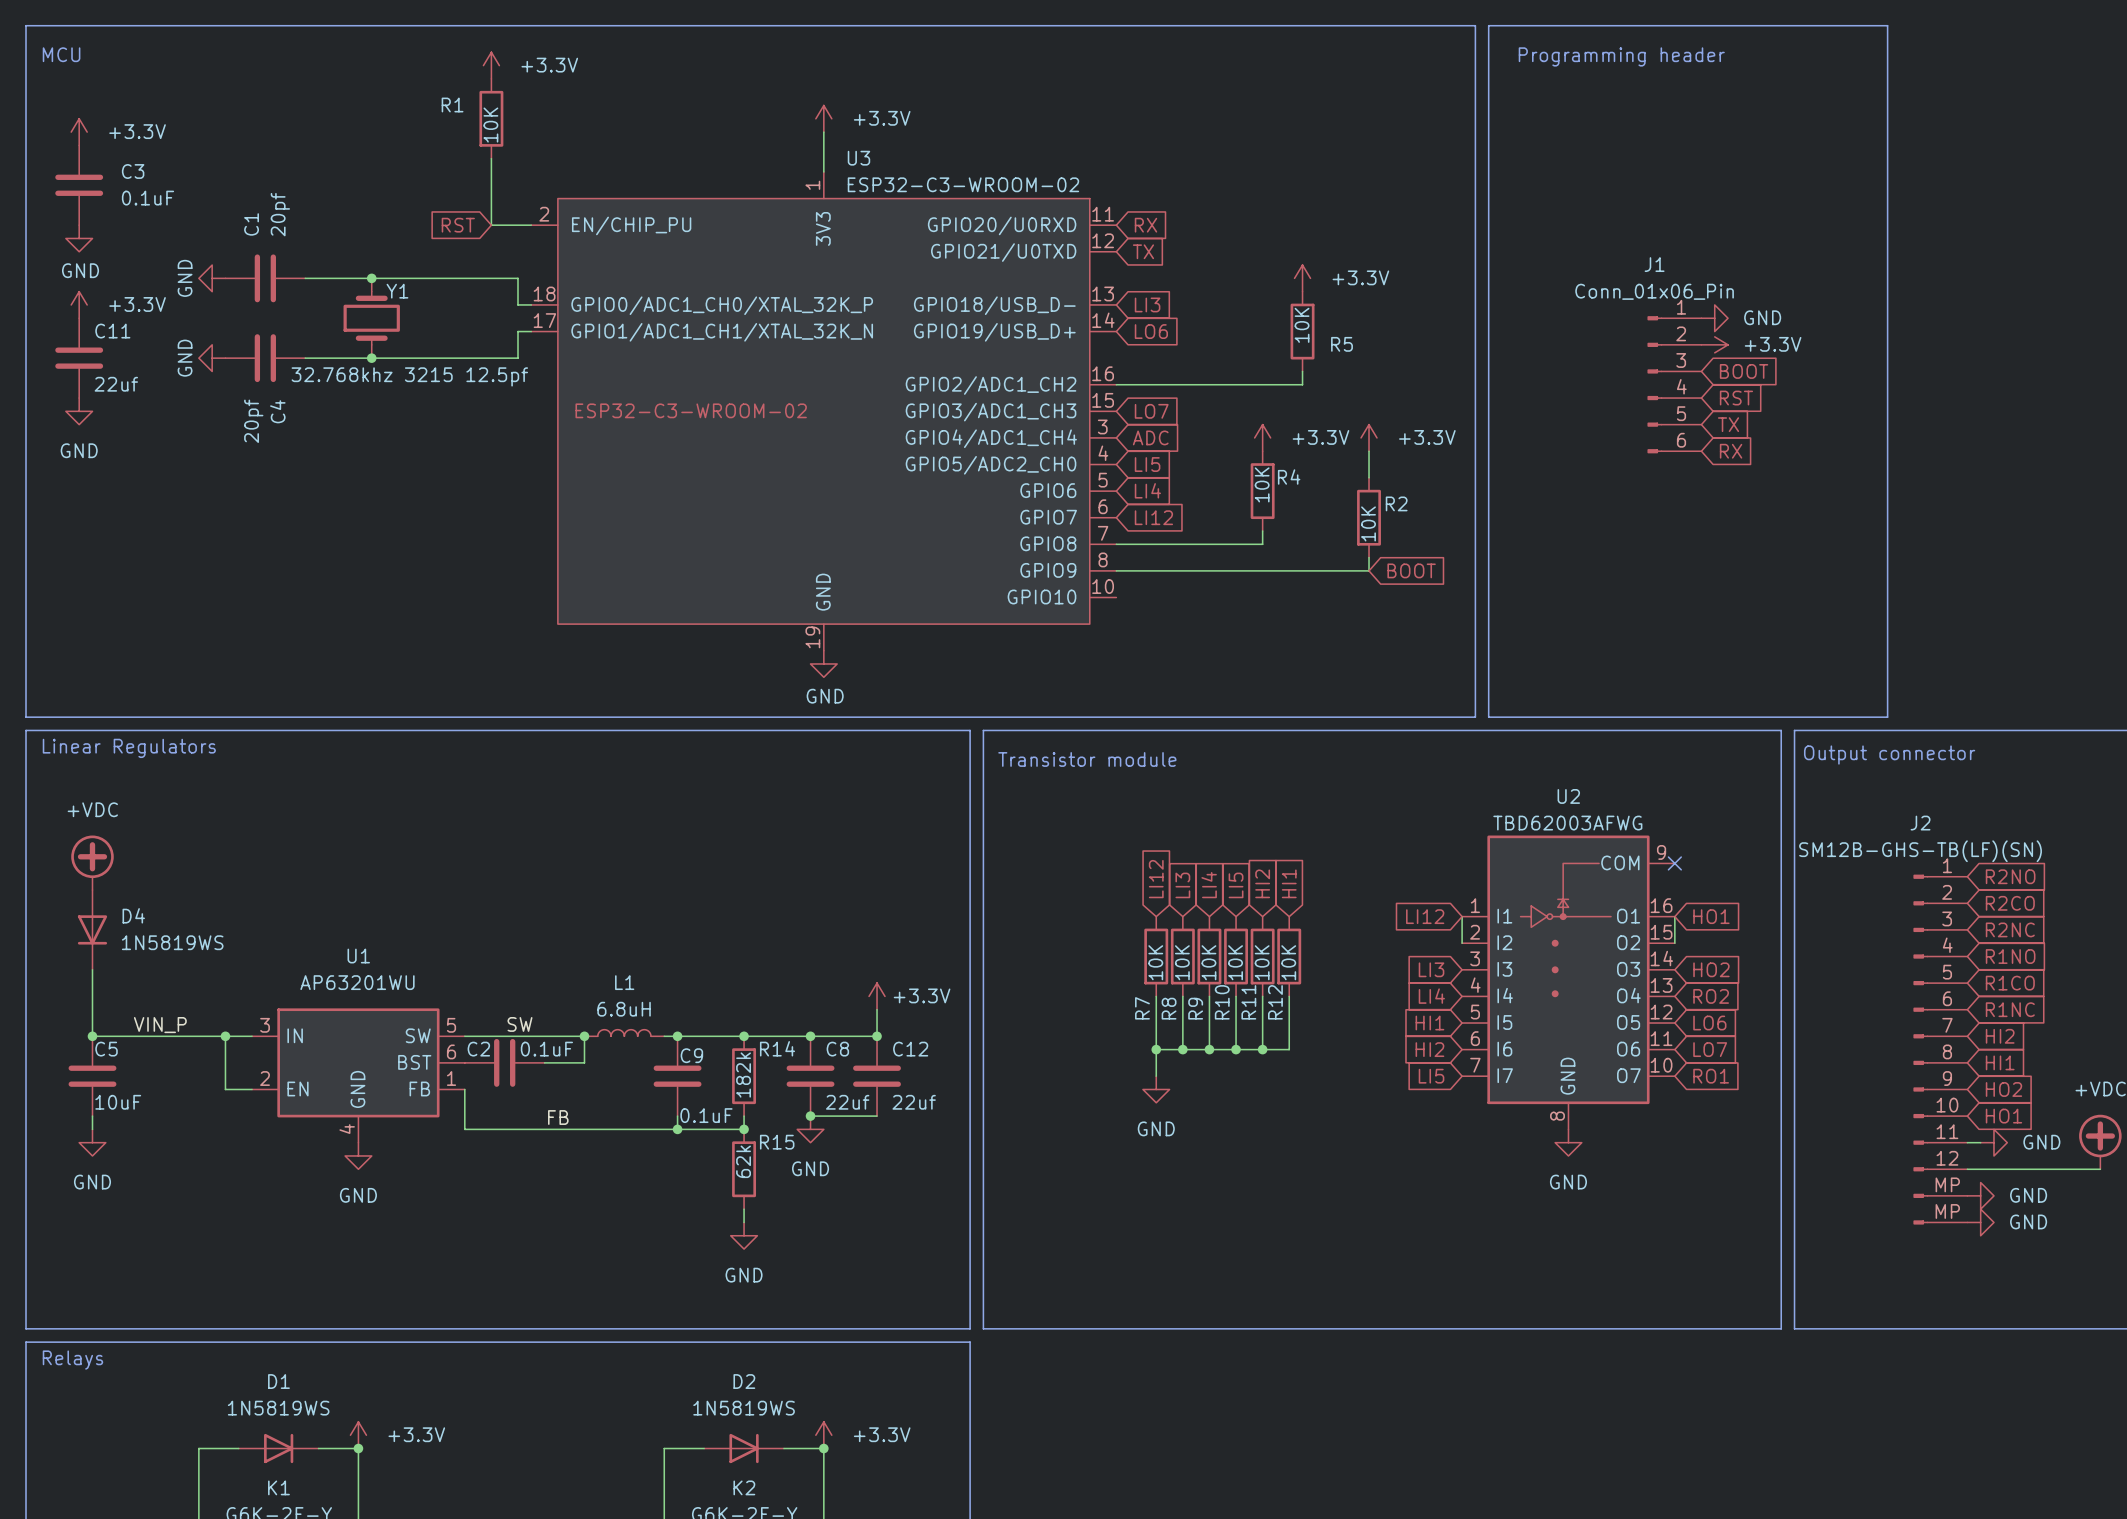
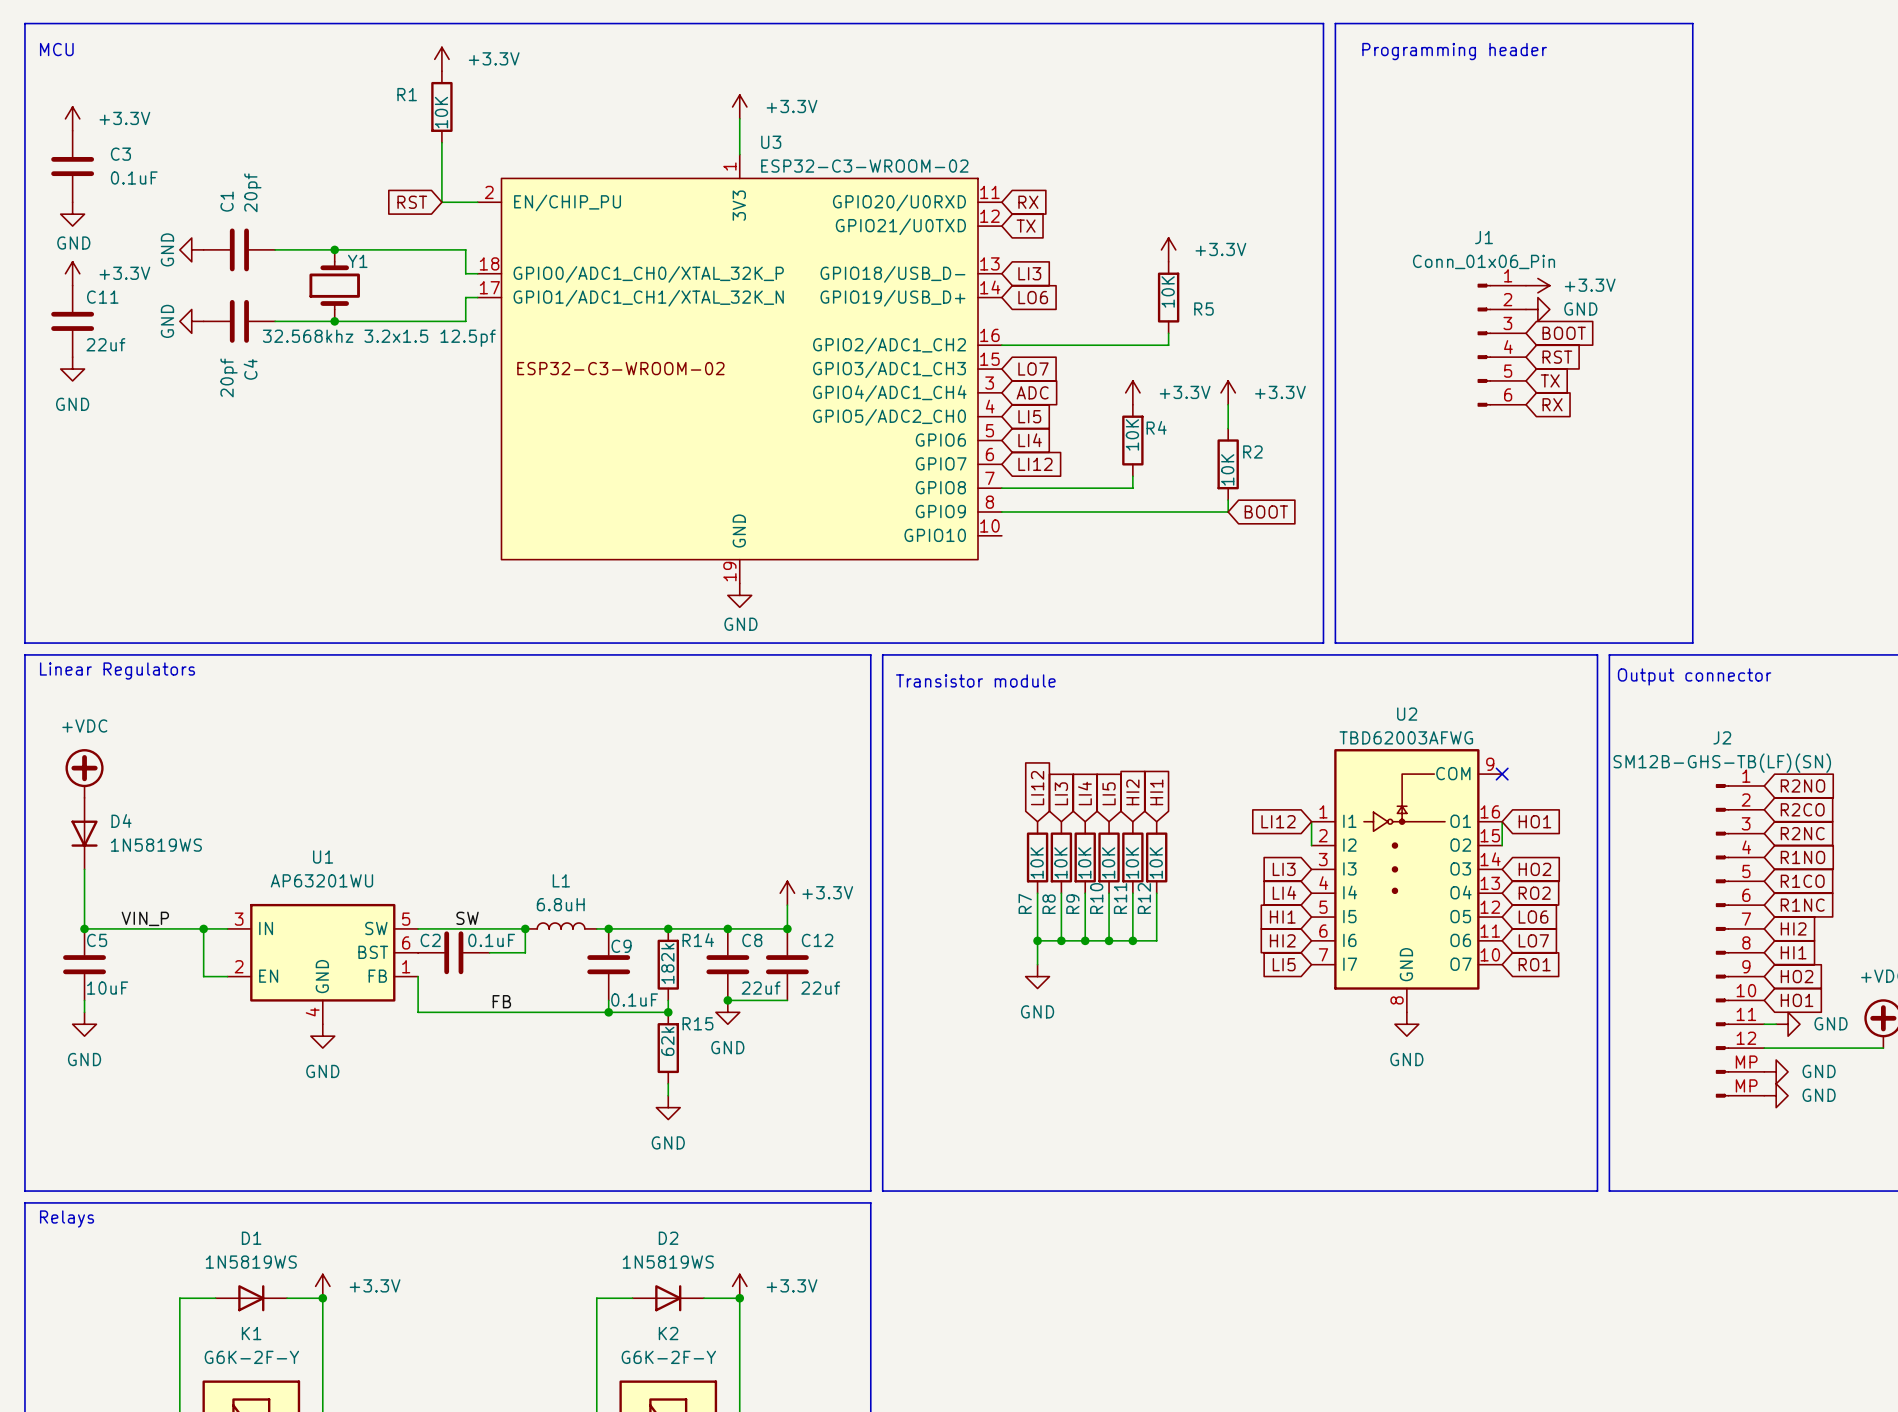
power symbol: GND (1714, 318) -> +3.3V (1537, 285)
power symbol: +3.3V (1714, 344) -> GND (1537, 309)
Y1 value: 32.768khz 3215 12.5pf (409, 376) -> 32.568khz 3.2x1.5 12.5pf (379, 338)

